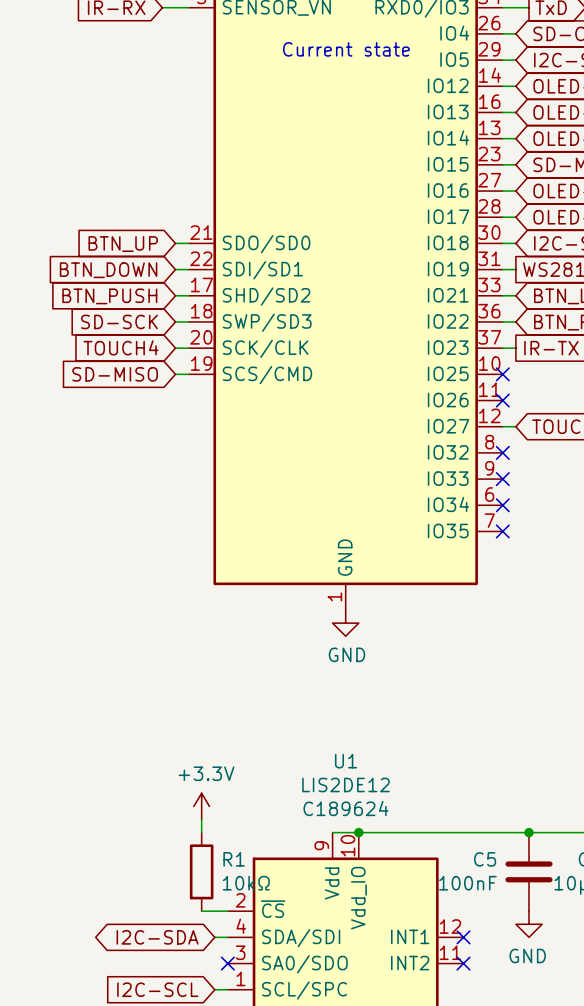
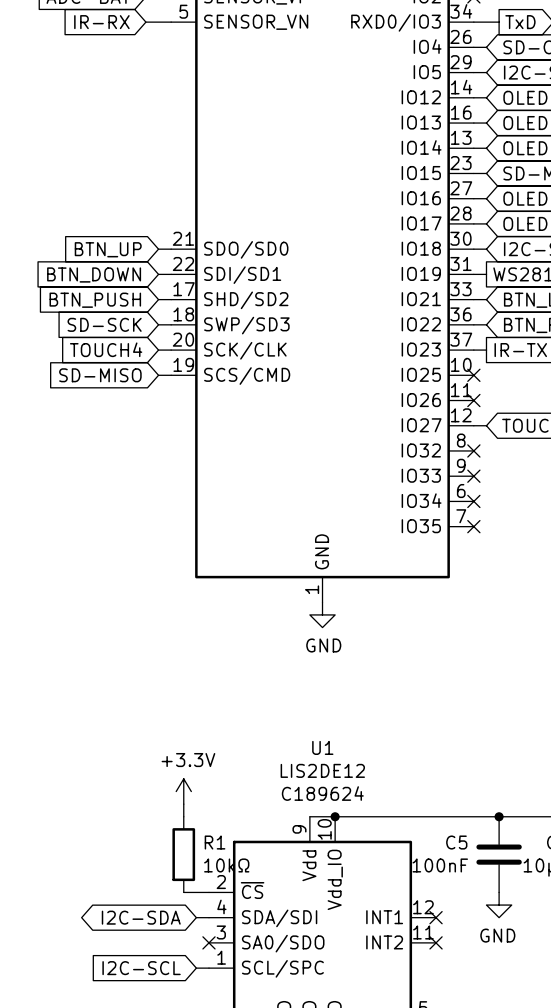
text: Current state (346, 49) -> none

